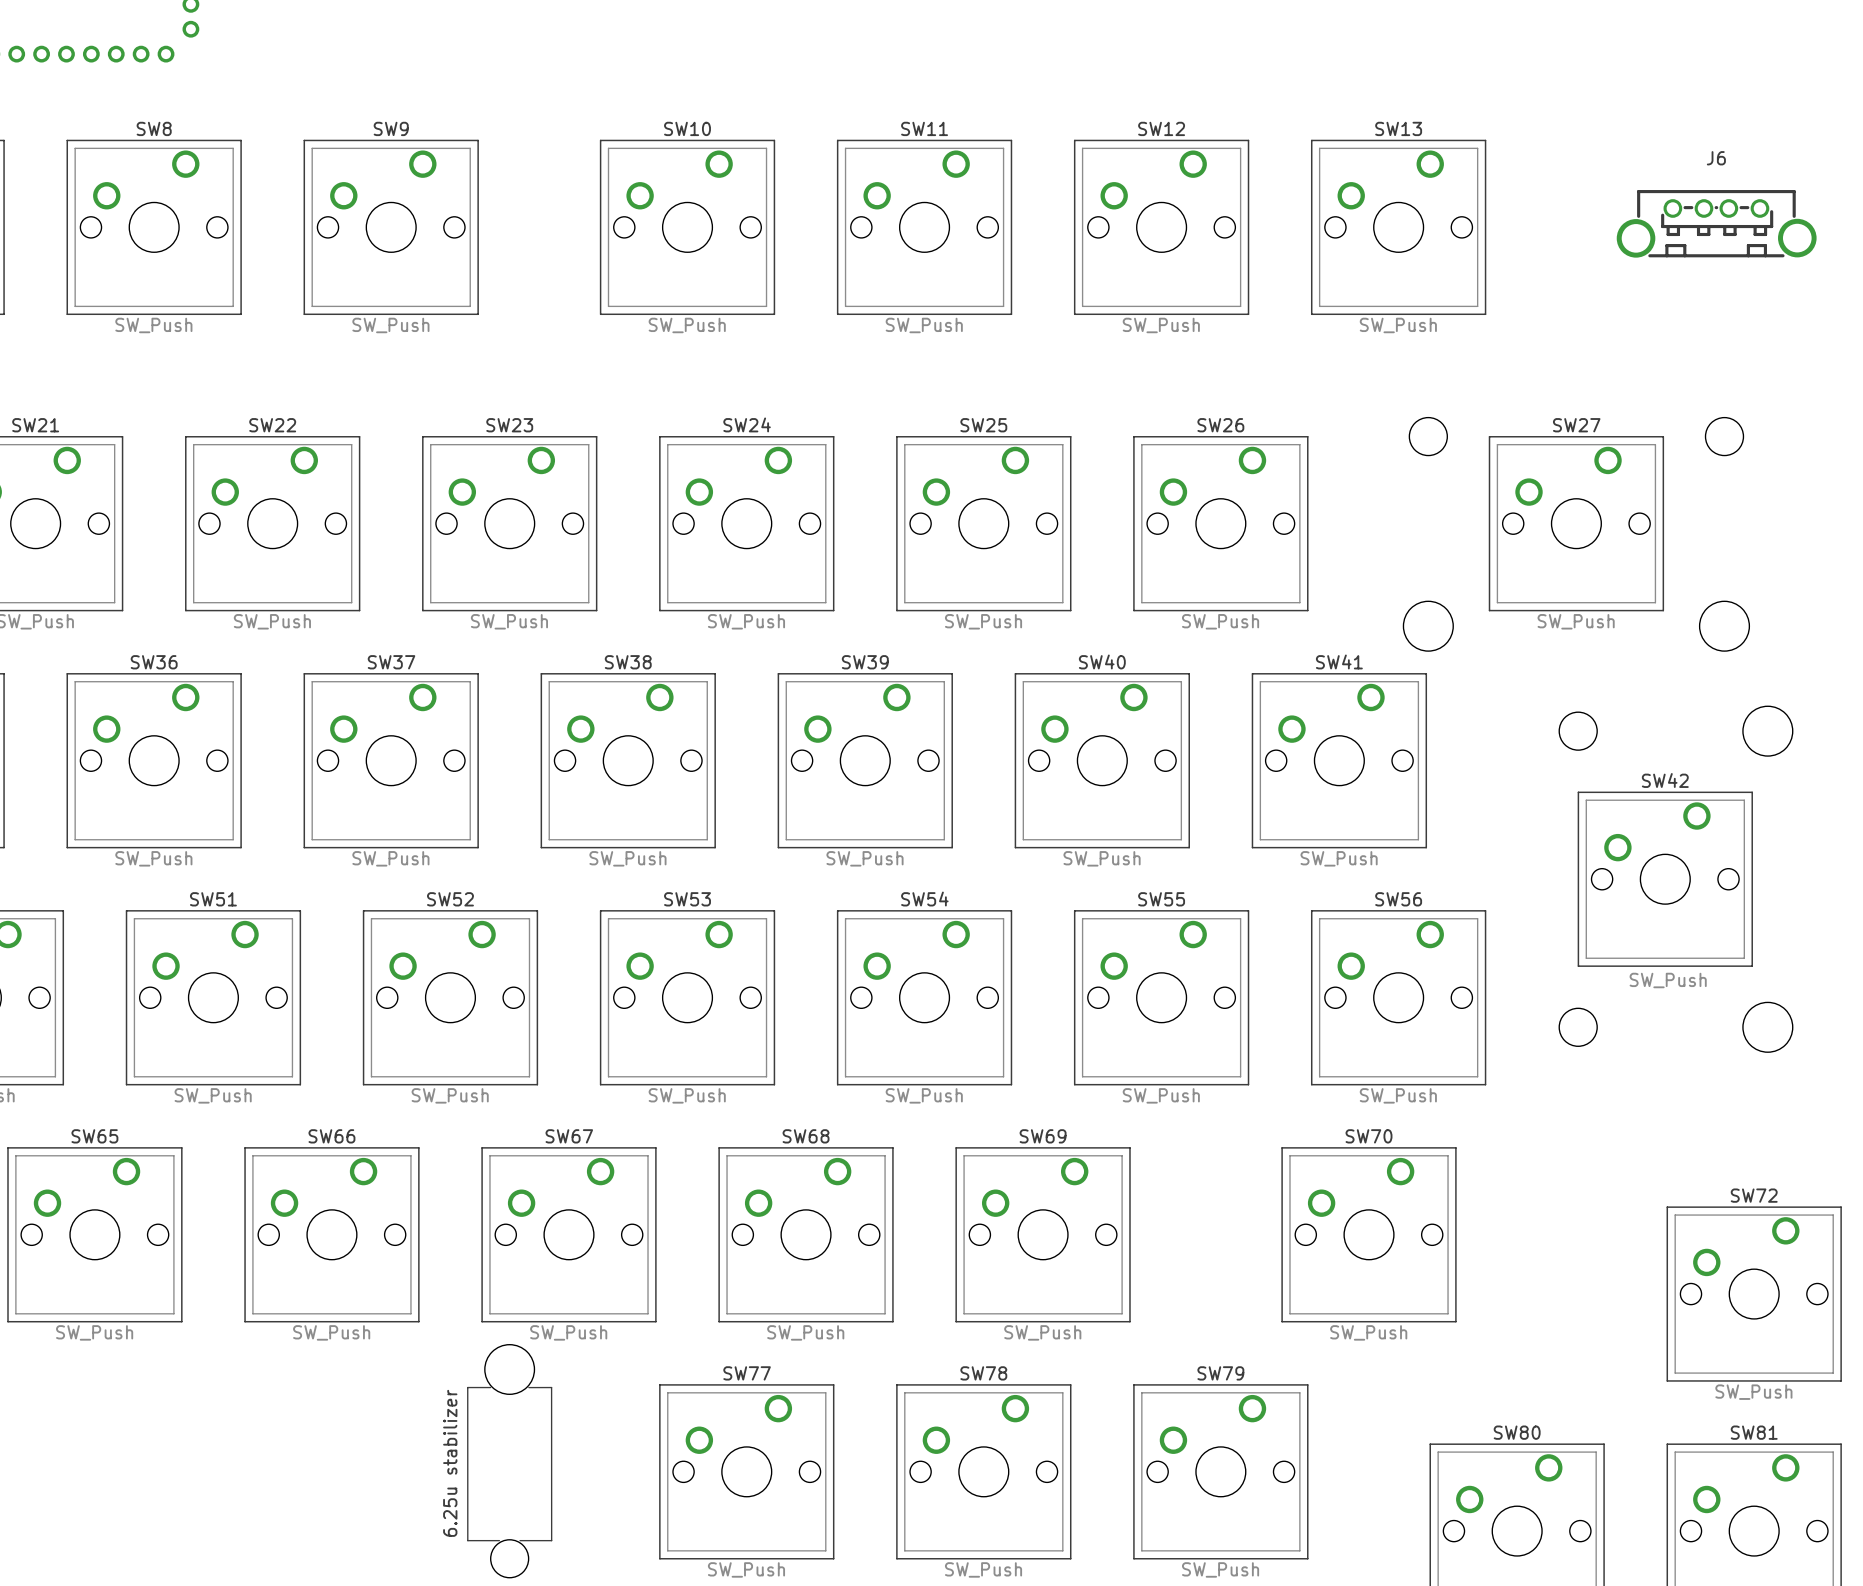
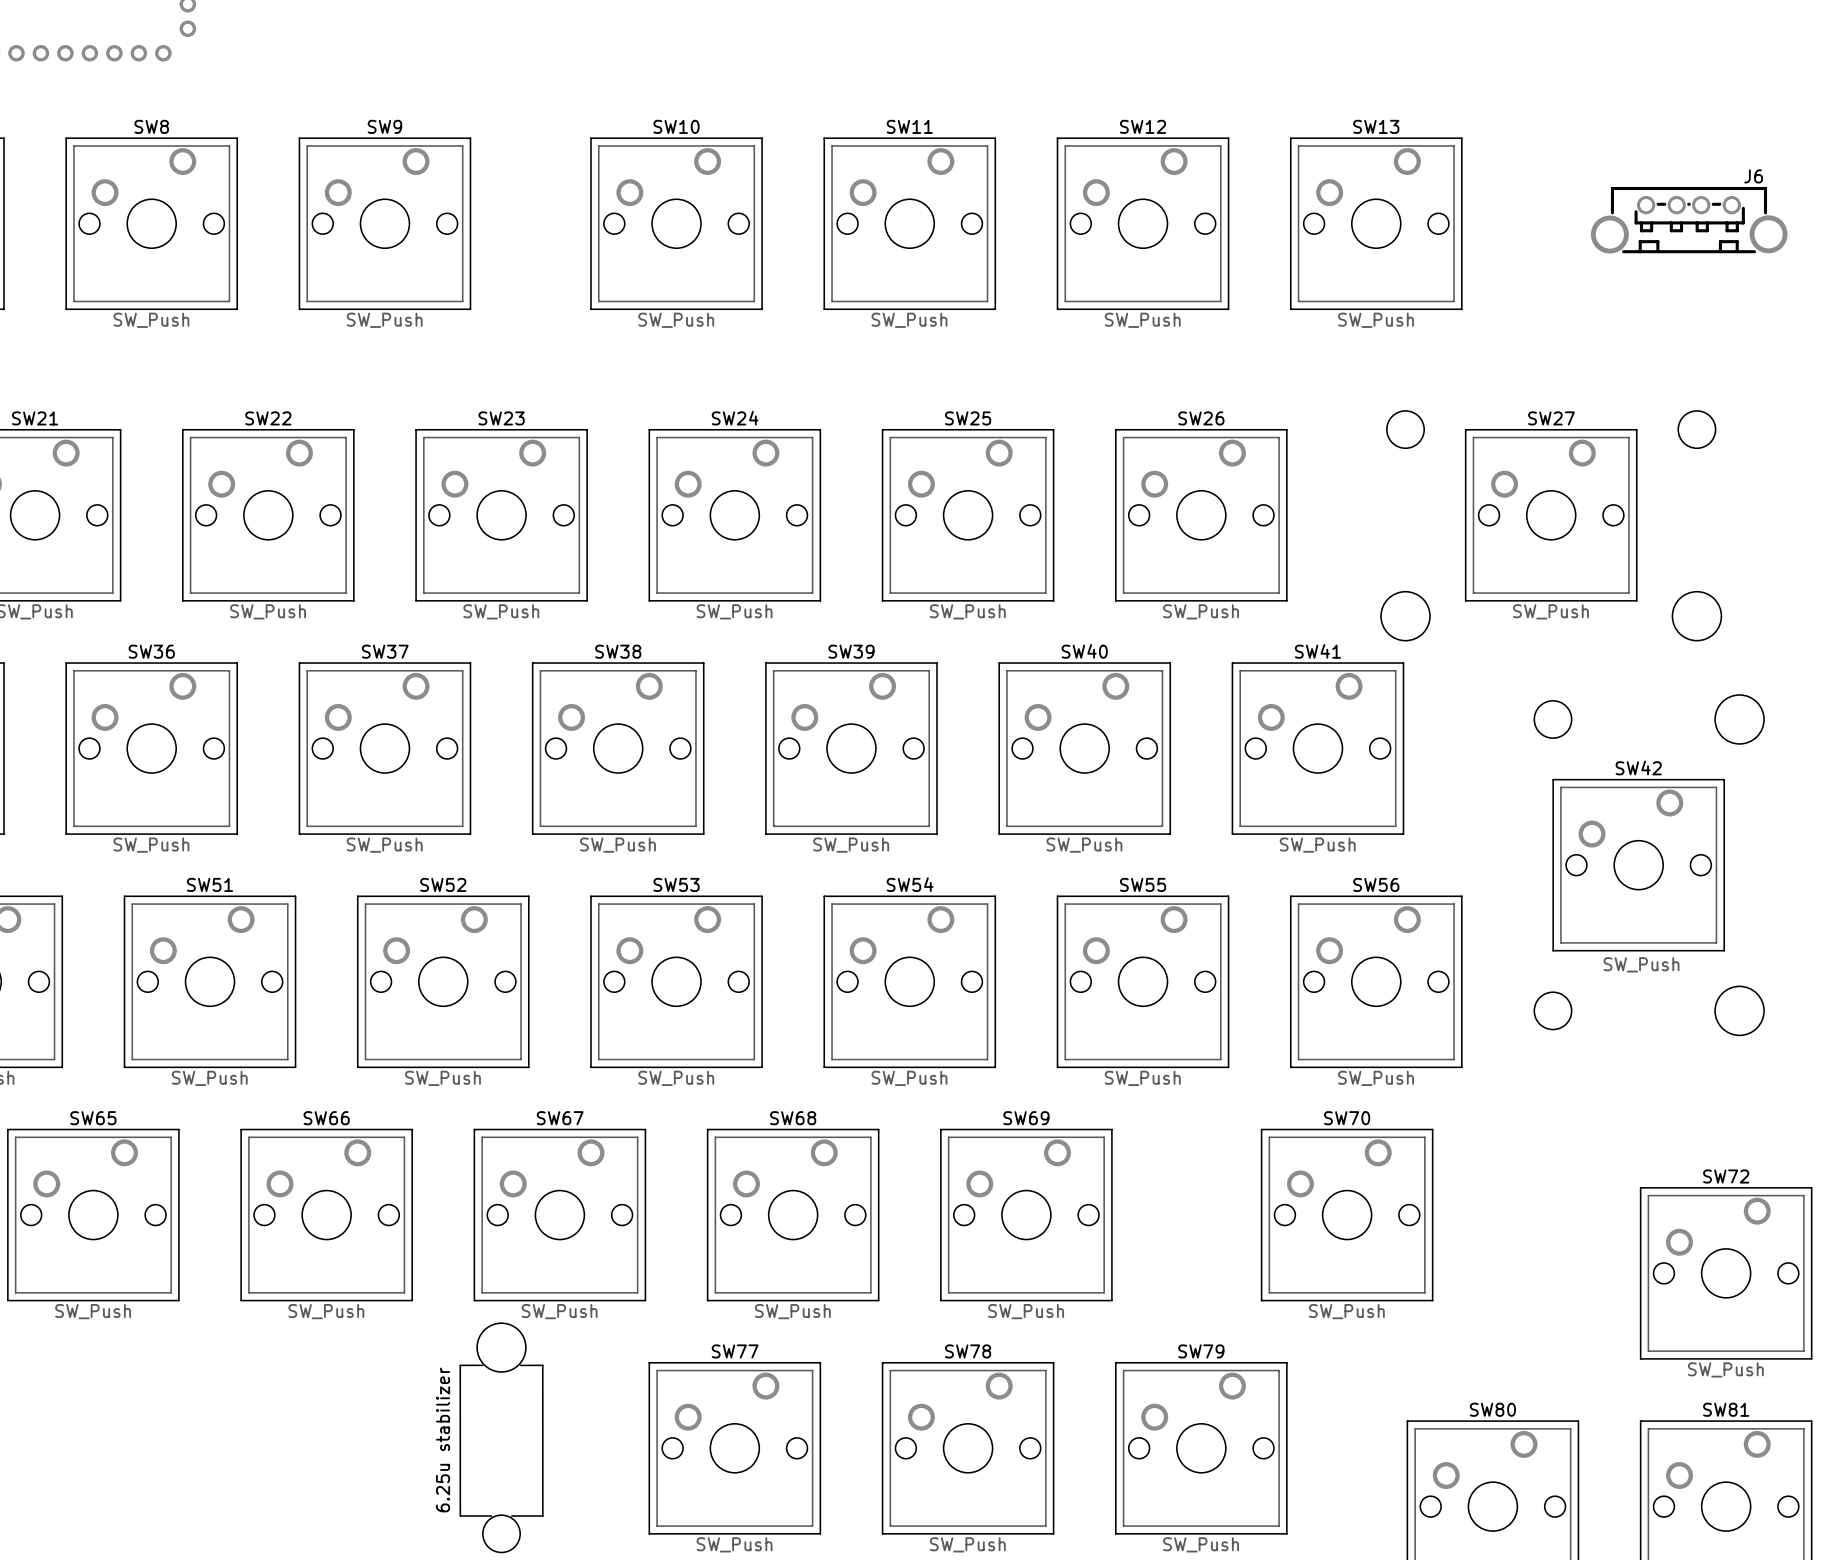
J6 name position: J6 (1716, 158) -> J6 (1753, 176)

